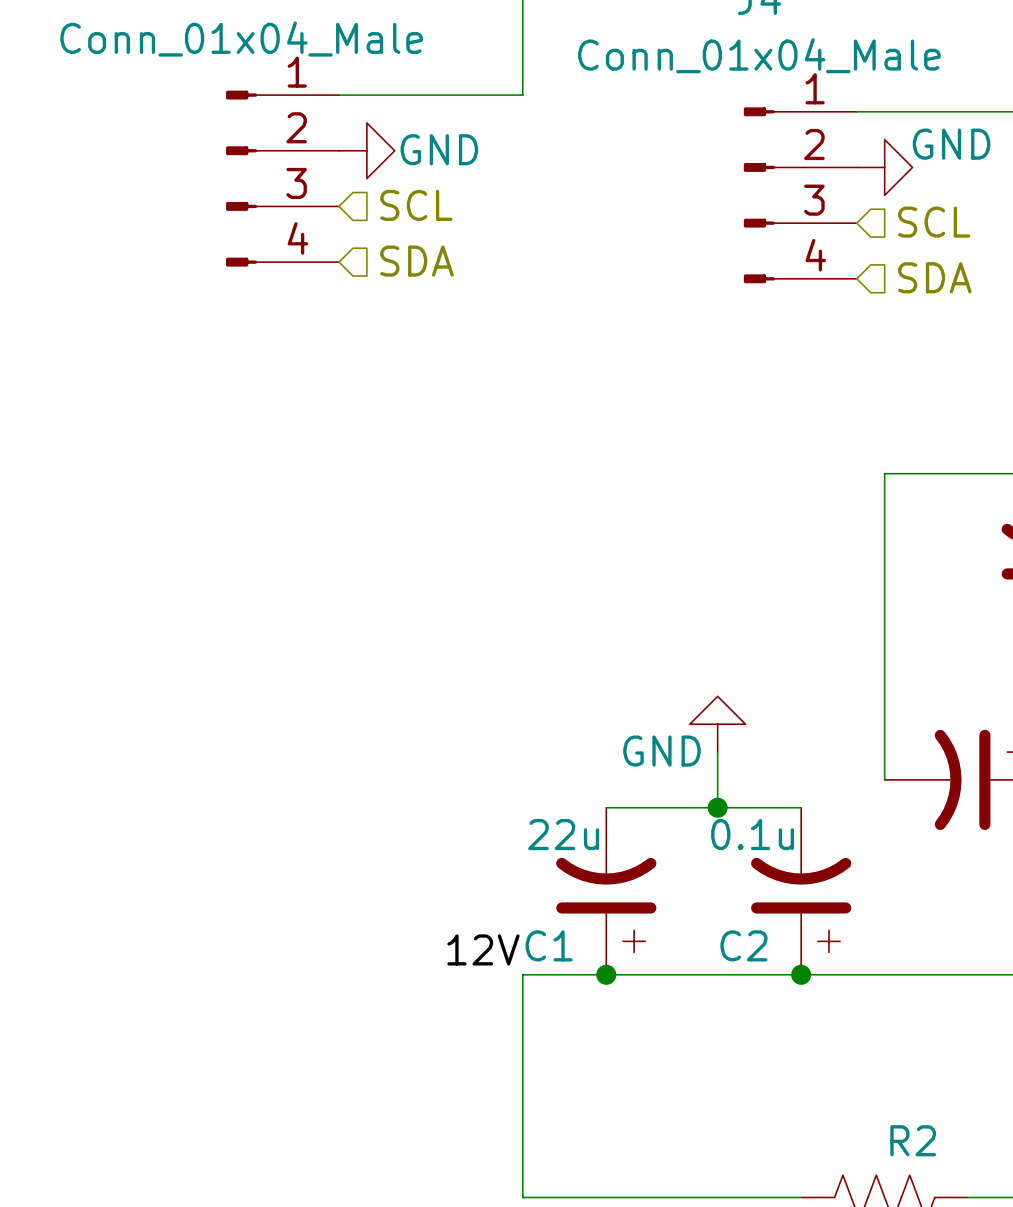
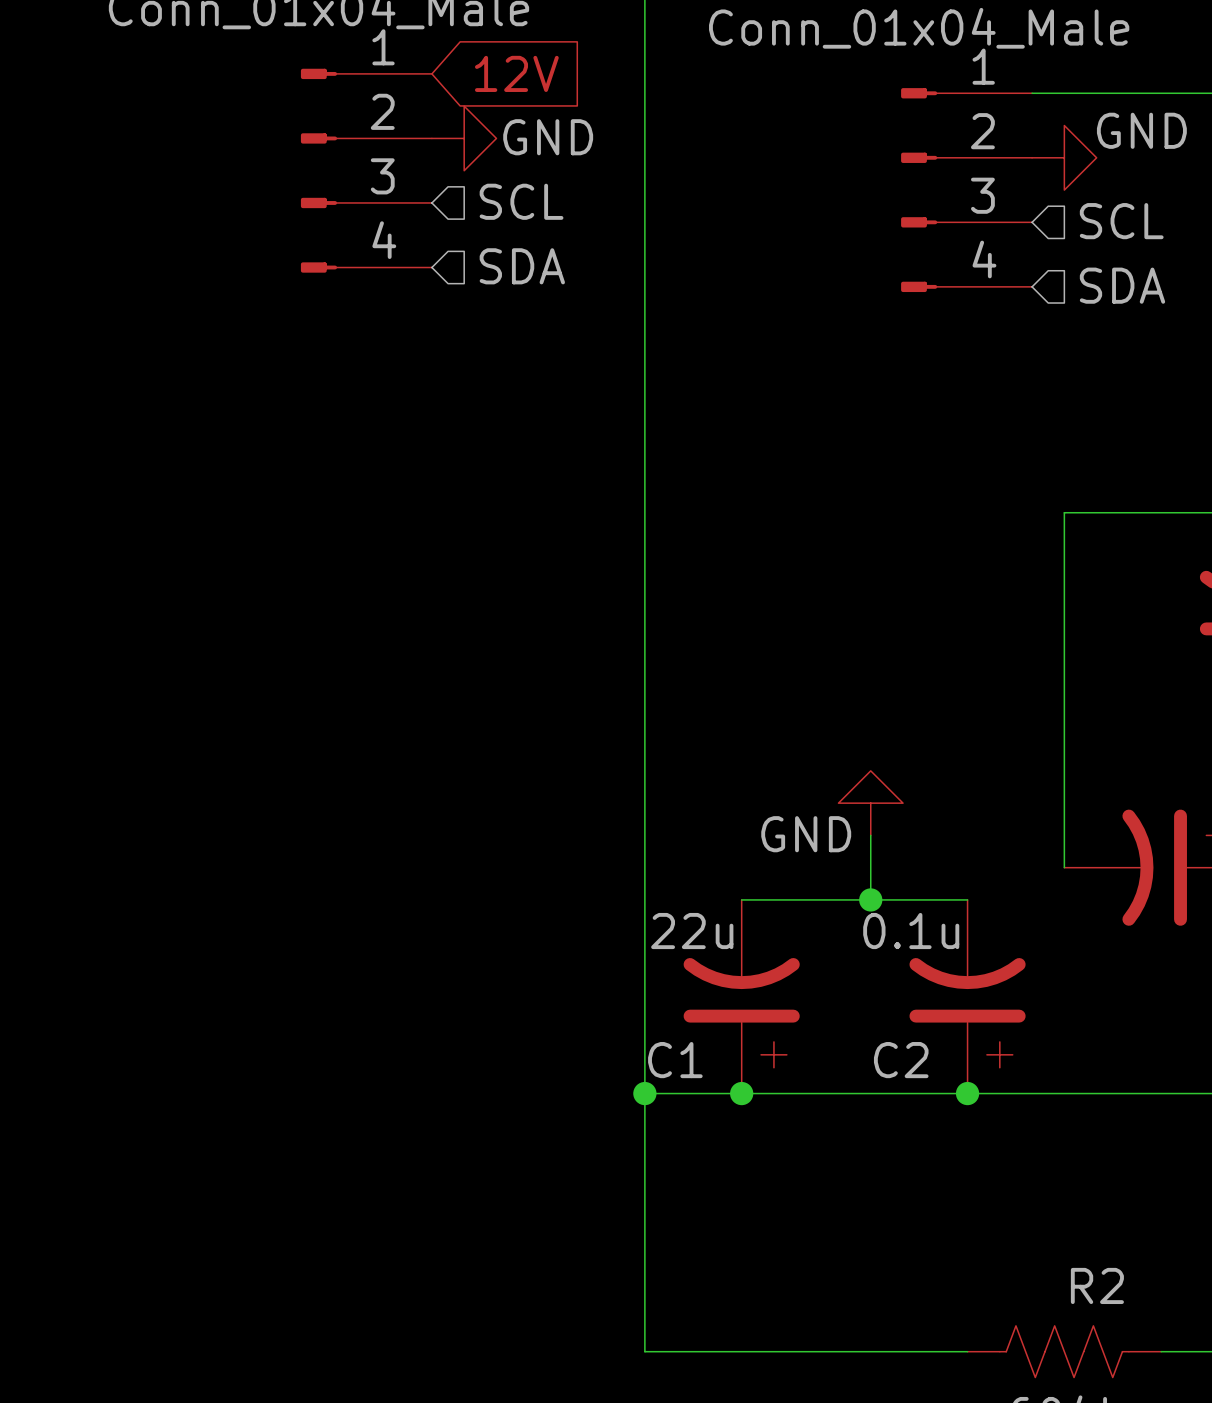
wire: (339, 95) (522, 95) -> (644, 1093) (644, 73)
global label: none -> 12V (516, 73)
label: 12V (483, 949) -> none
junction: none -> (644, 1093)

